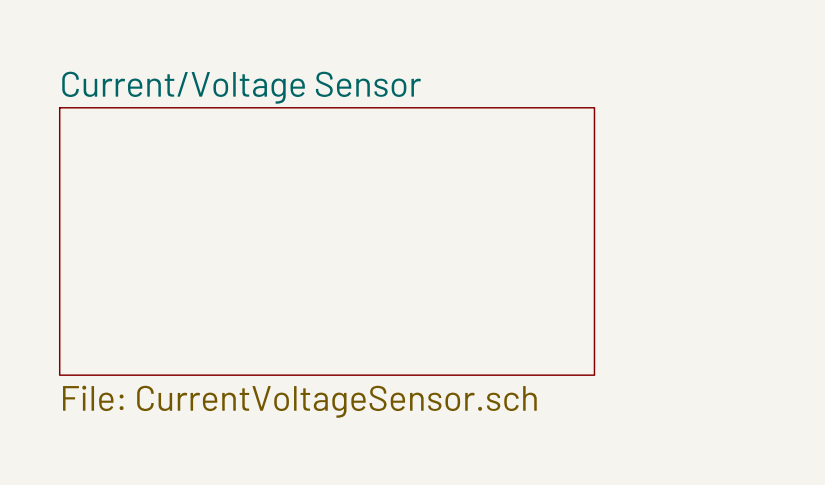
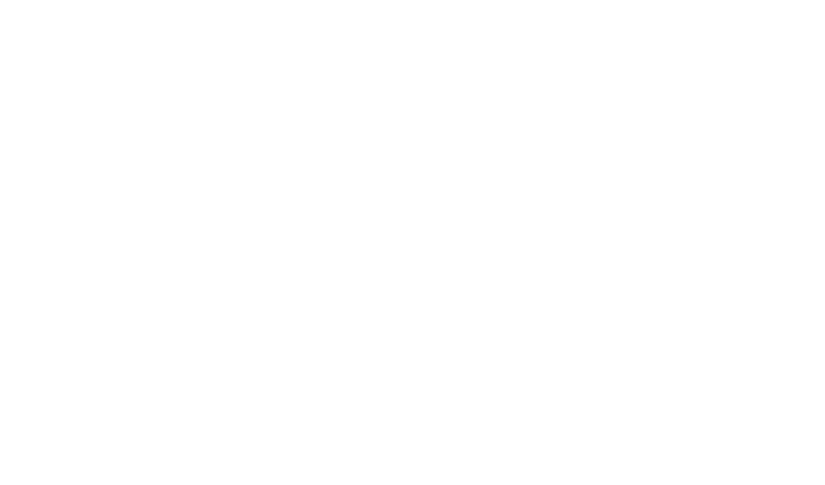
sheet Current/Voltage Sensor: File: CurrentVoltageSensor.sch (327, 241) -> none

